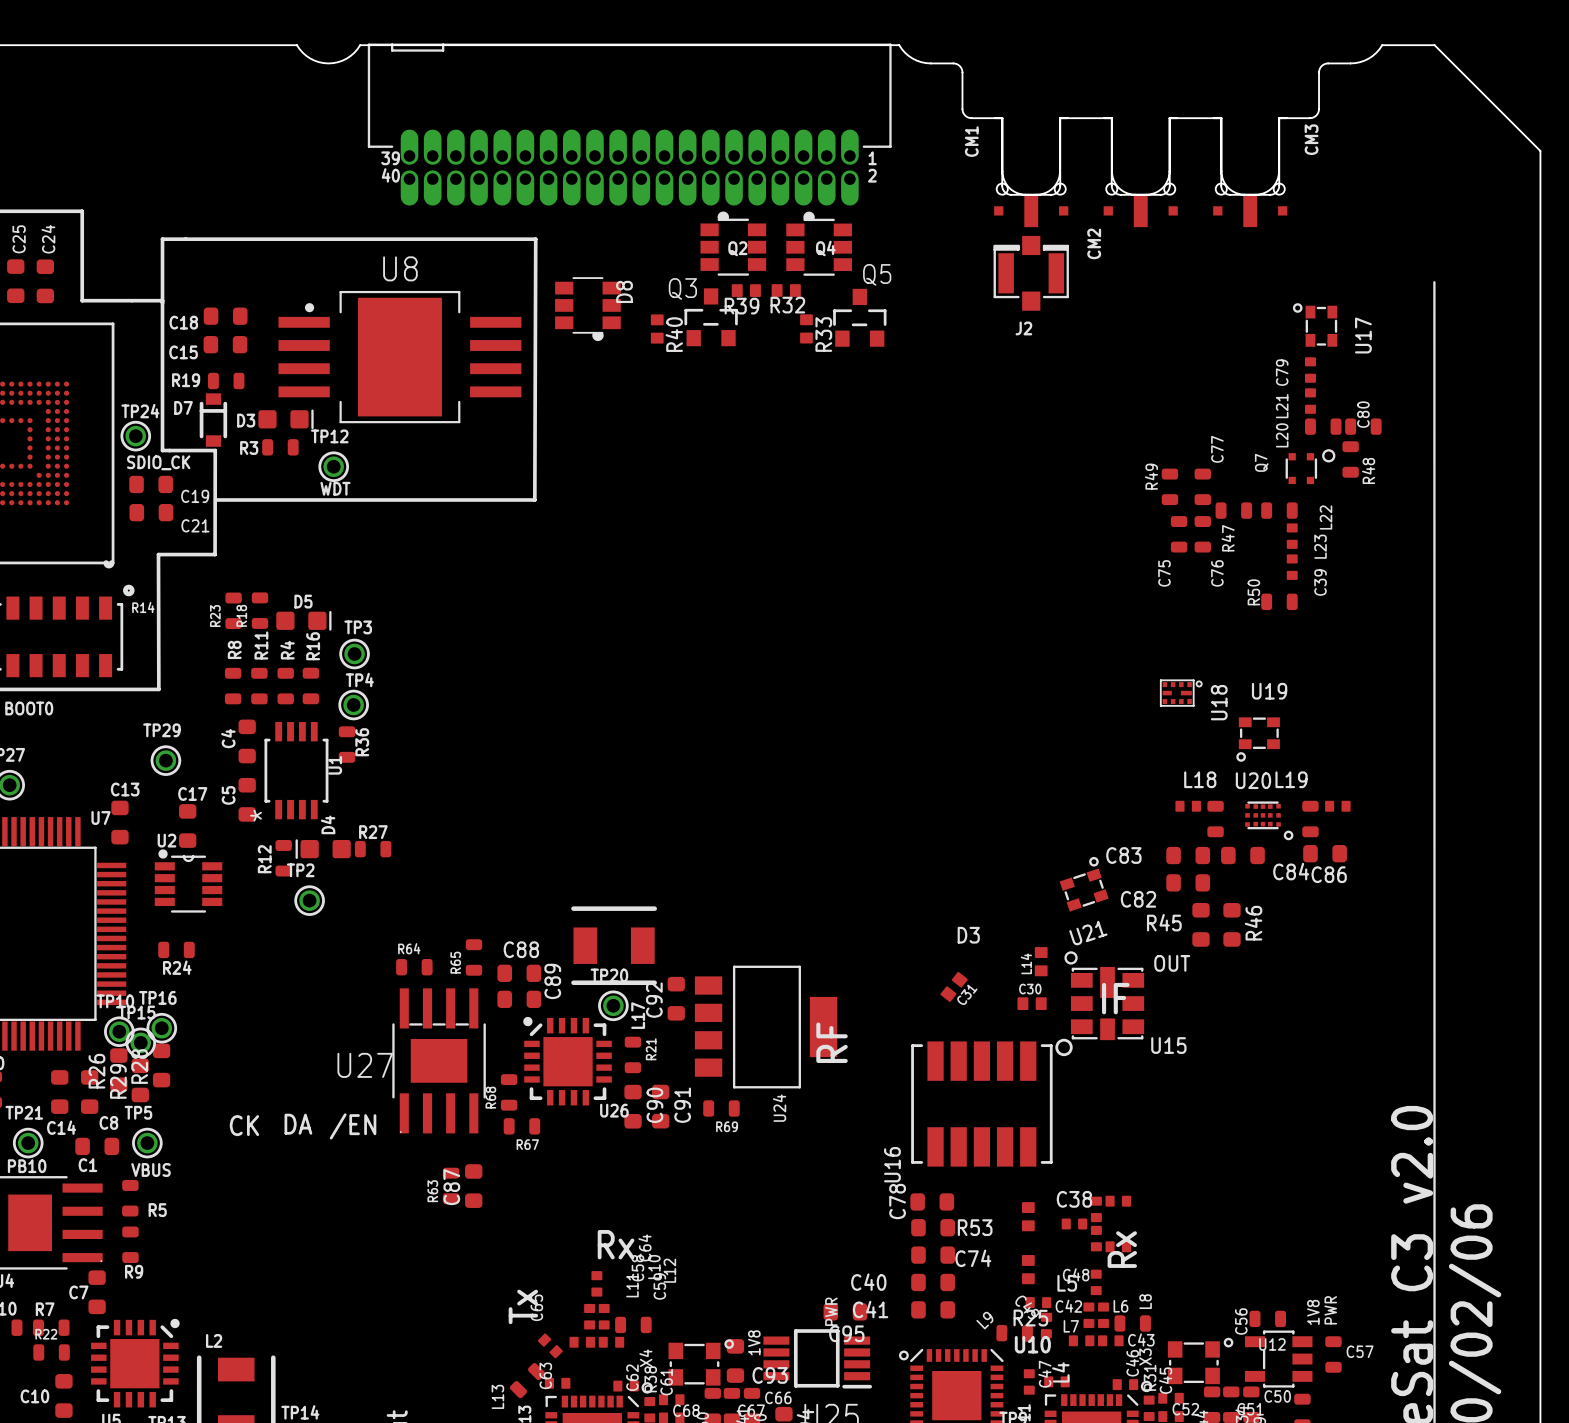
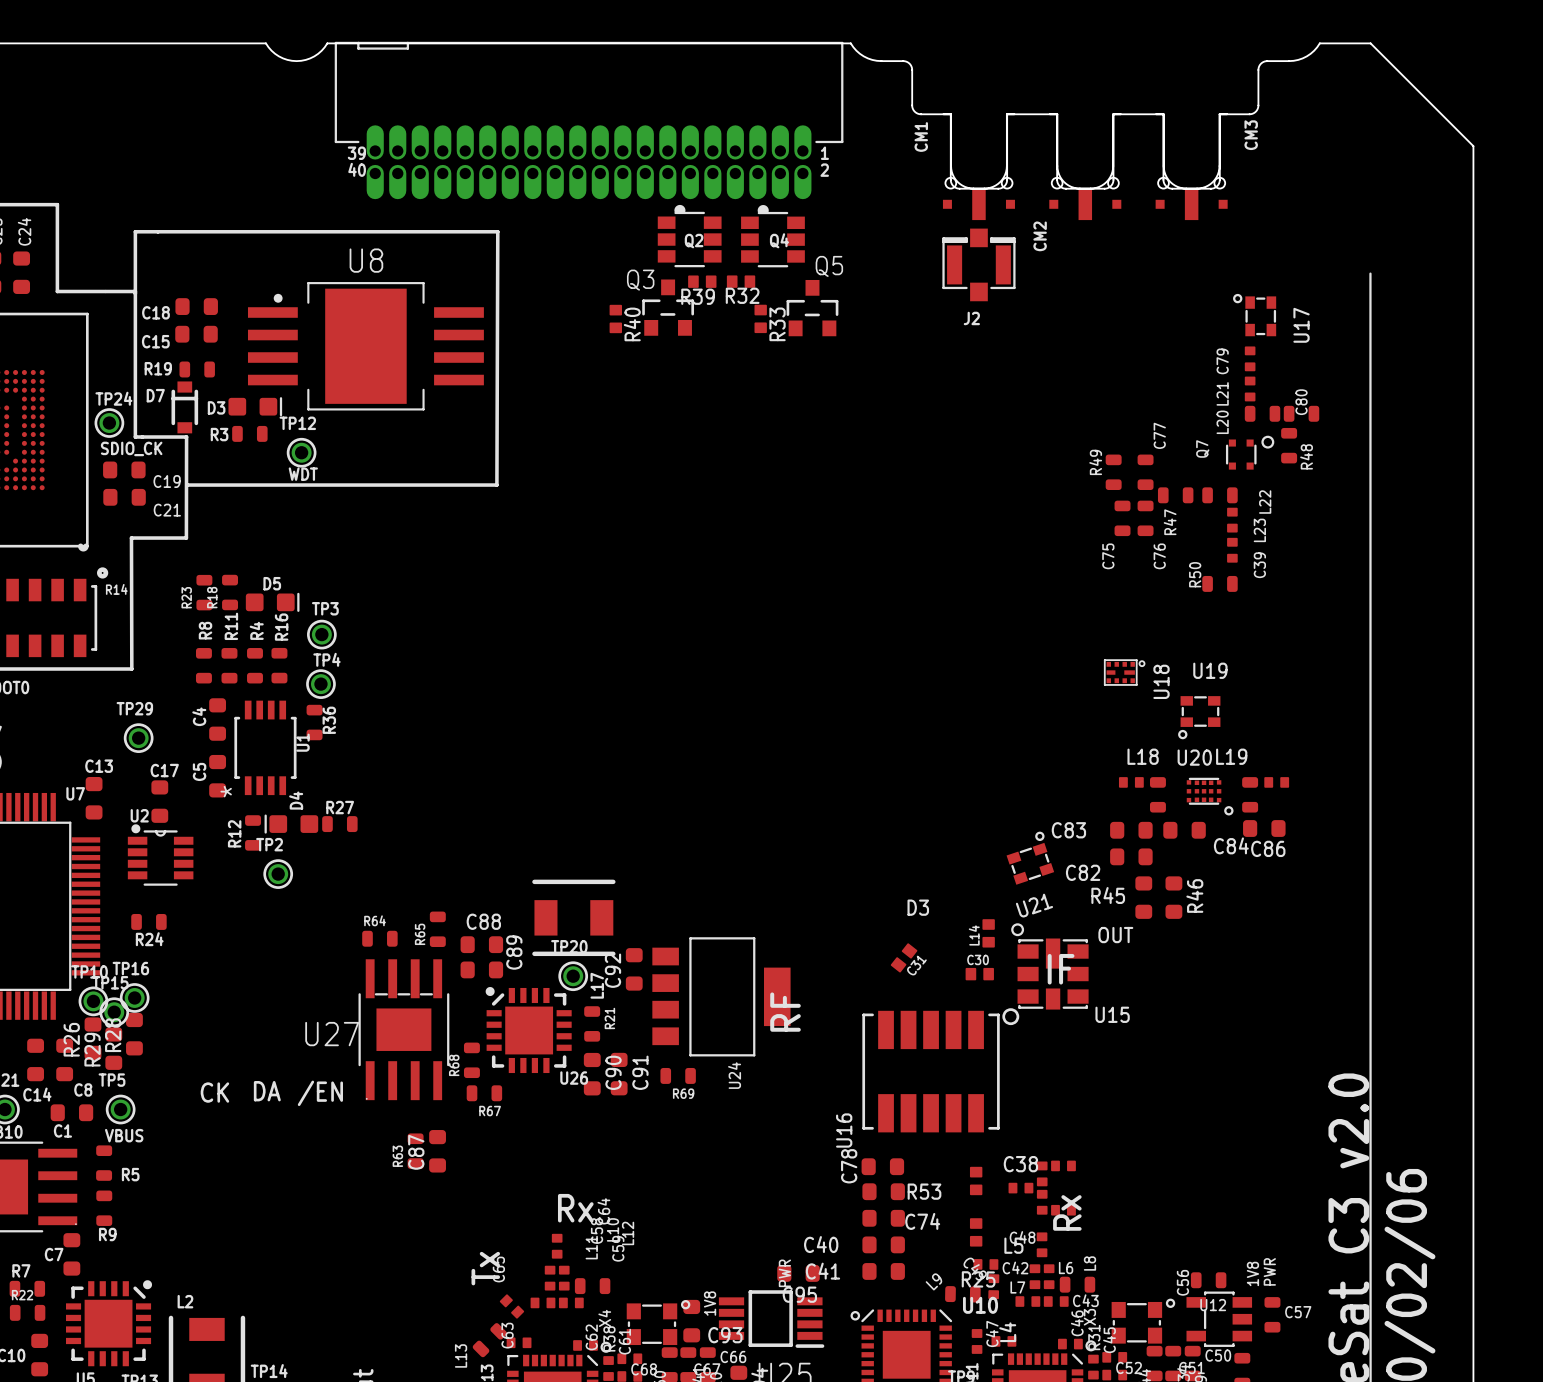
D8: (587, 309) -> none

